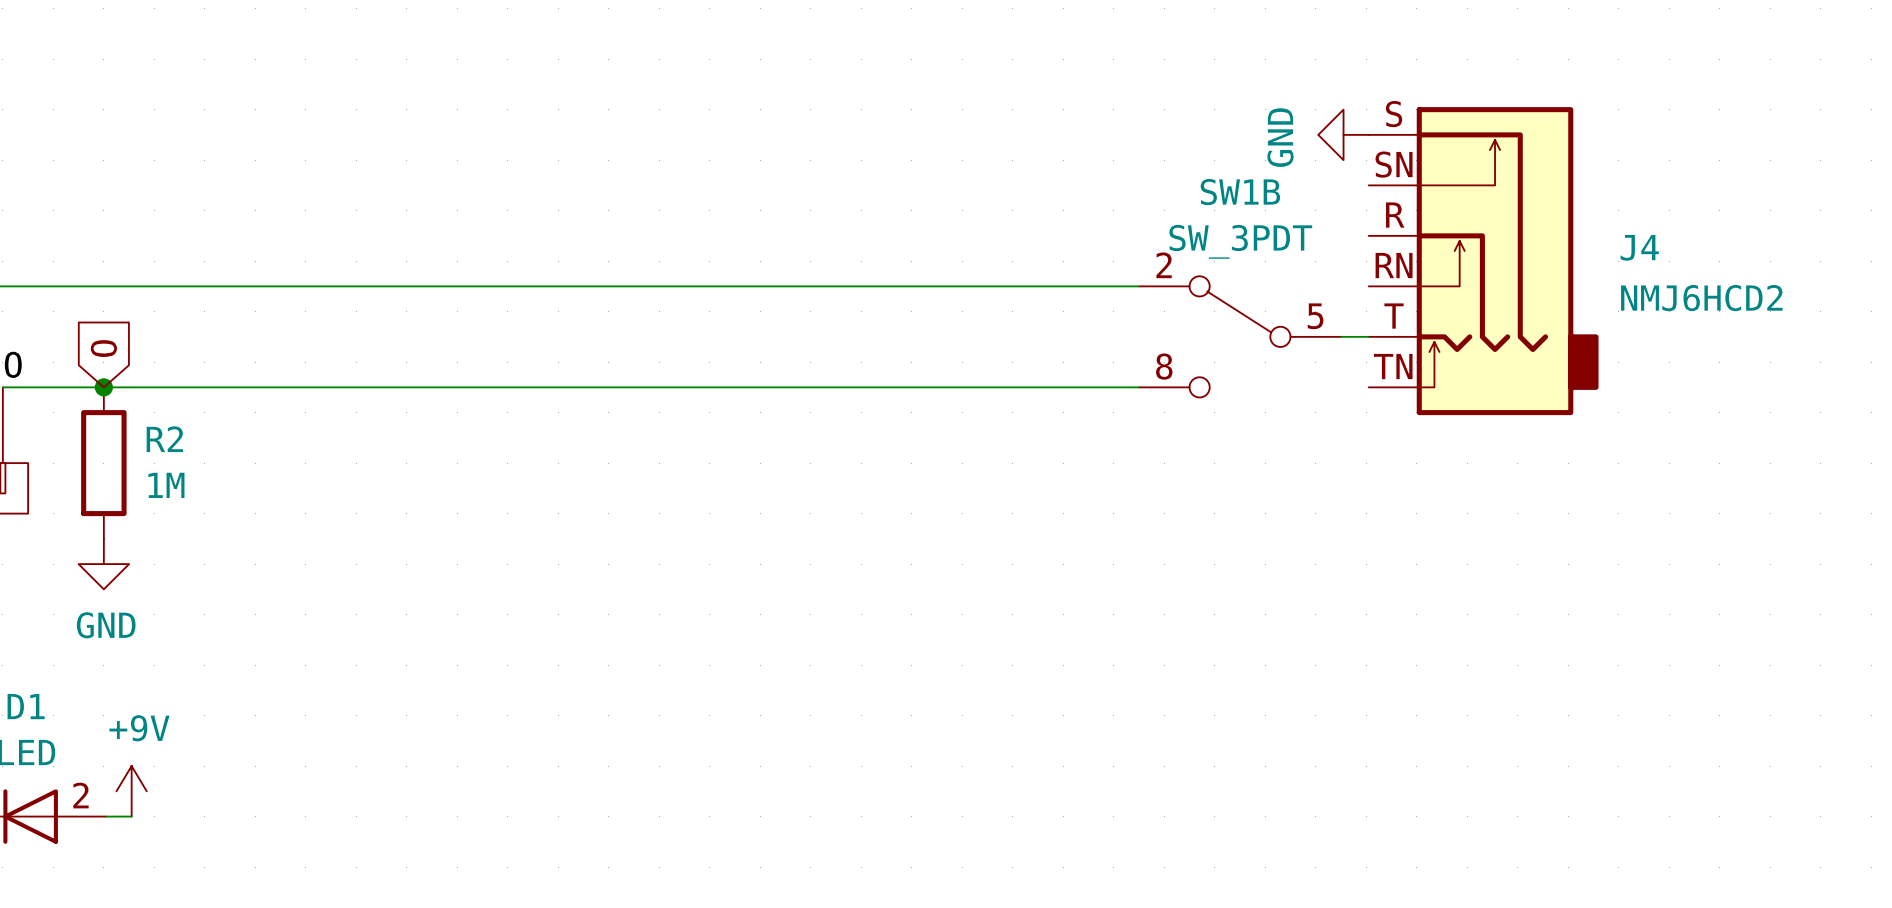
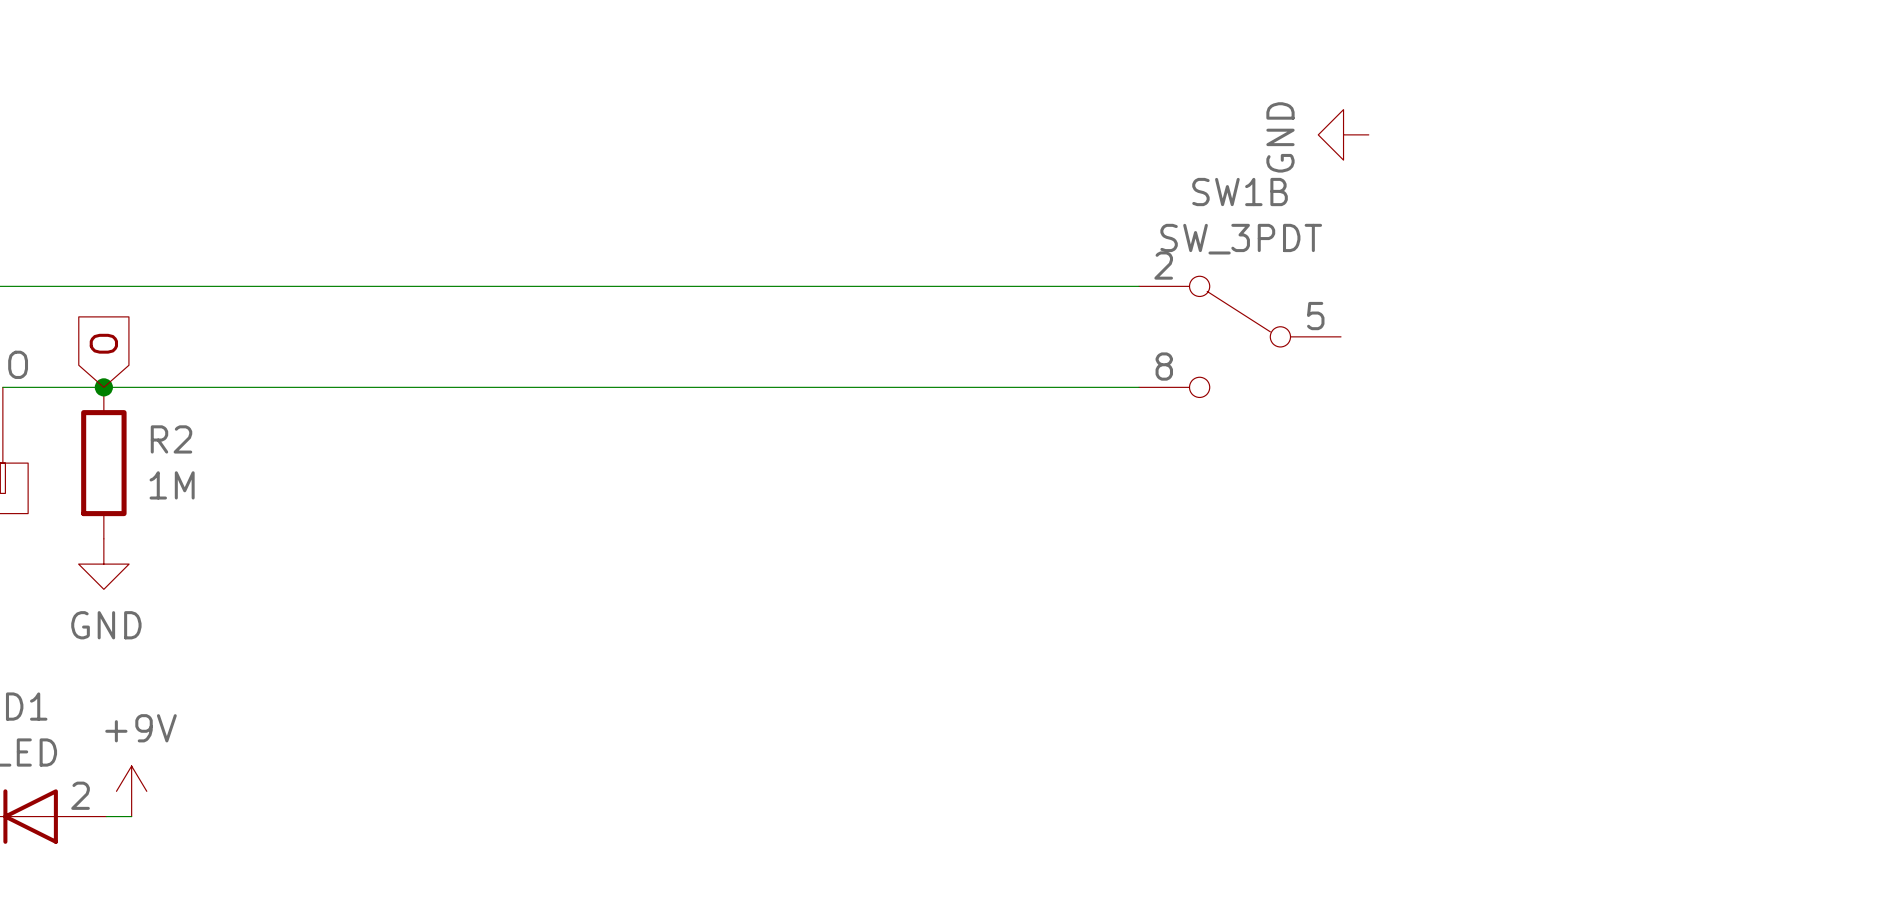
J4: NMJ6HCD2 (1483, 261) -> none
wire: (1341, 336) (1368, 336) -> none

